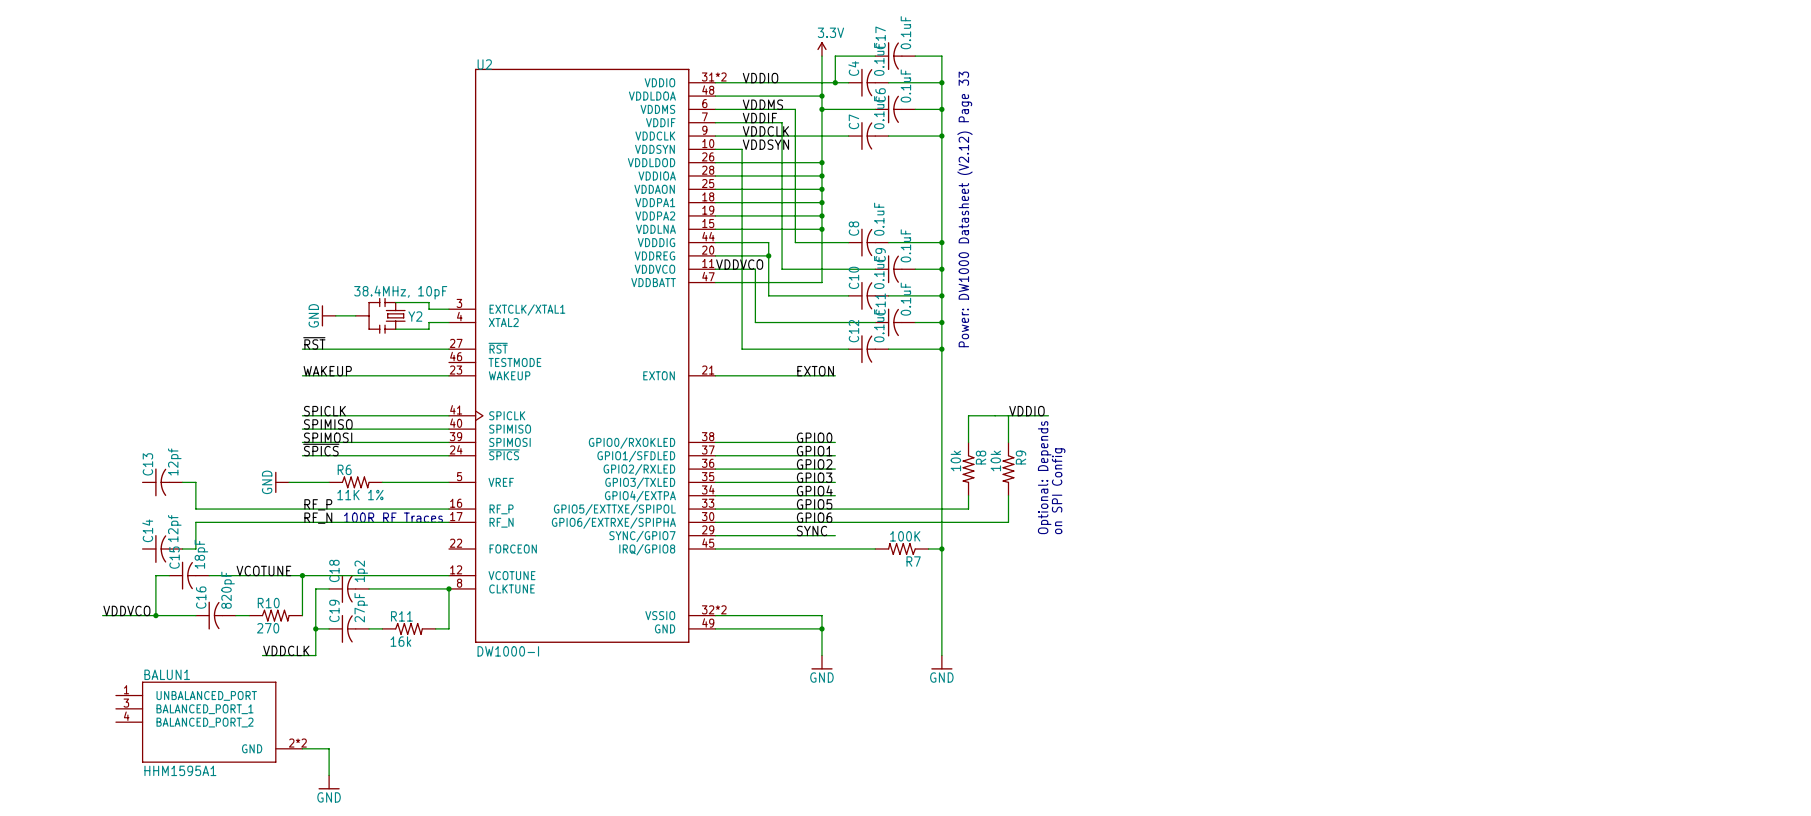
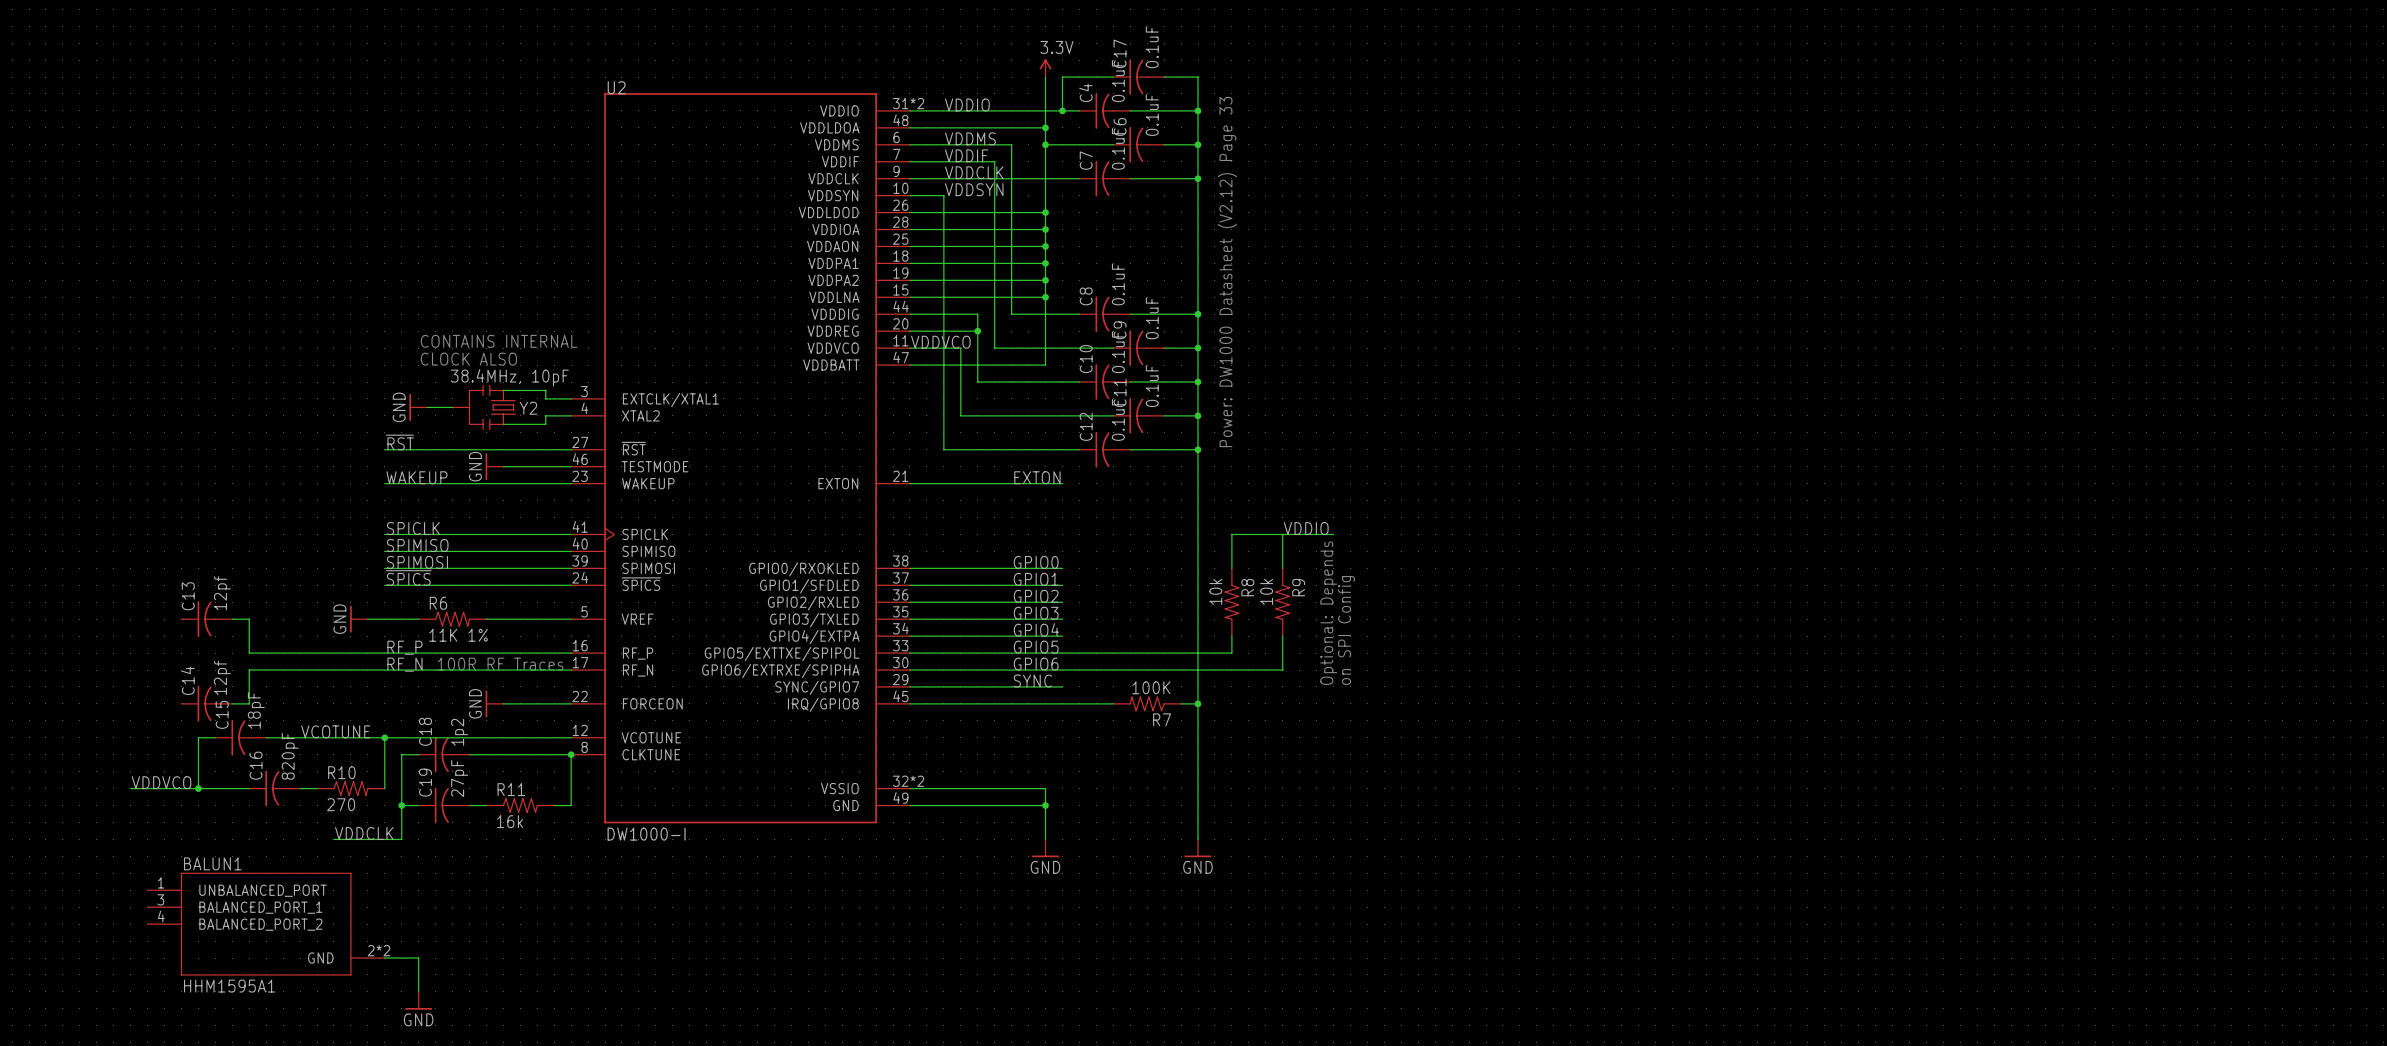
text: none -> CONTAINS INTERNAL (499, 341)
text: none -> CLOCK ALSO (468, 359)
power symbol: none -> GND (494, 466)
wire: none -> (503, 466) (571, 466)
power symbol: none -> GND (494, 703)
wire: none -> (503, 703) (571, 703)

